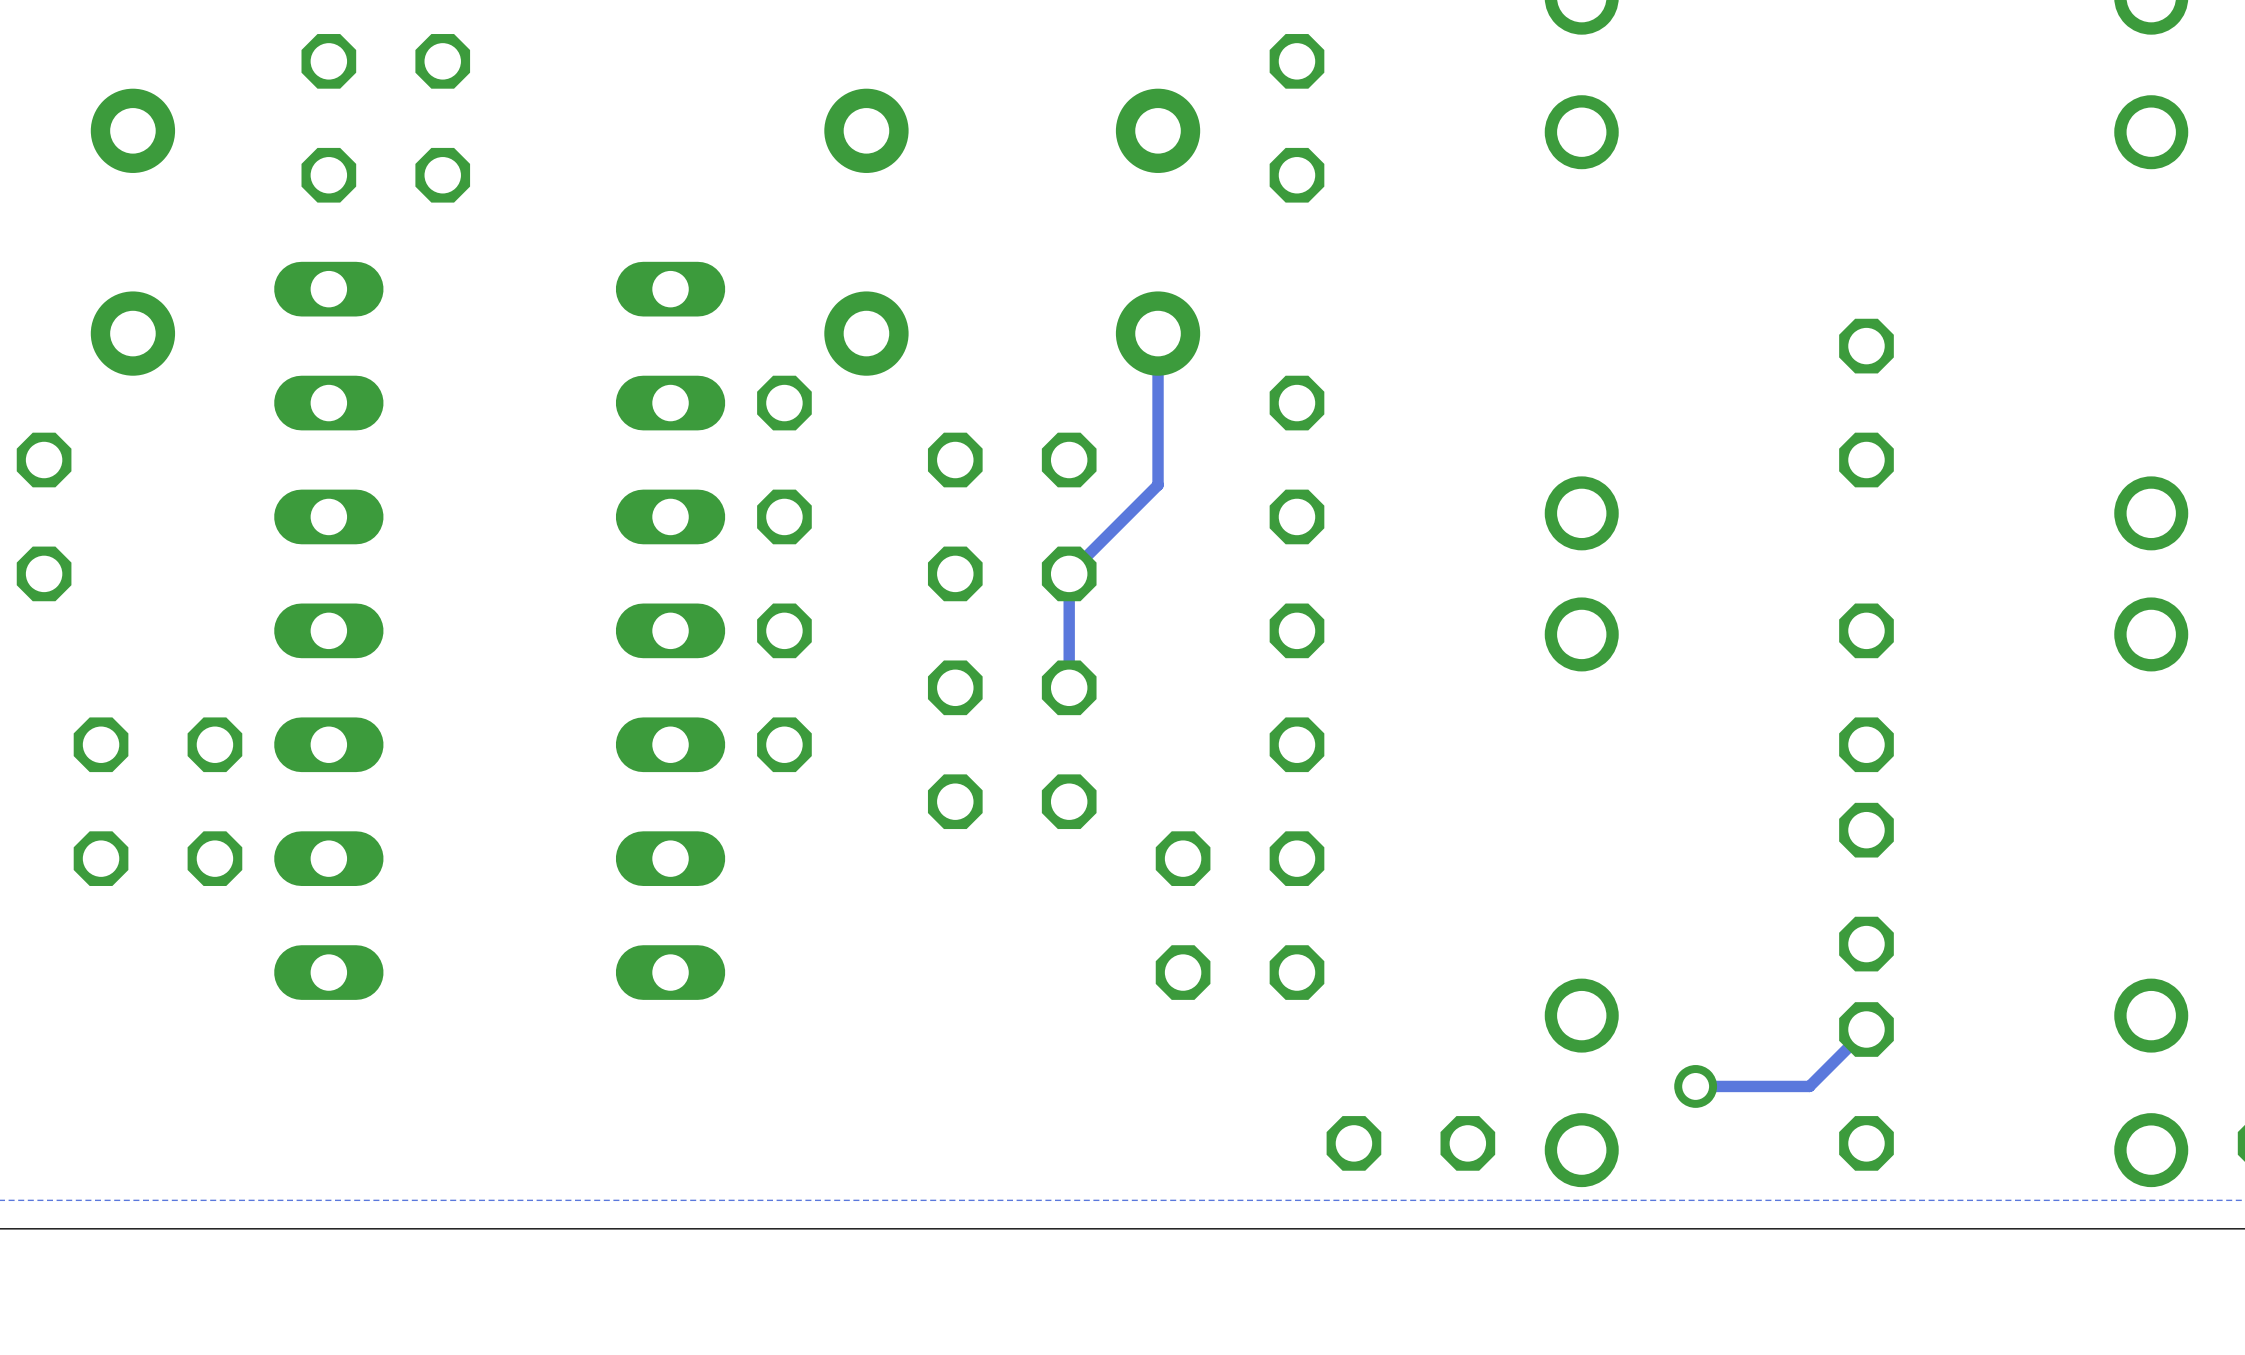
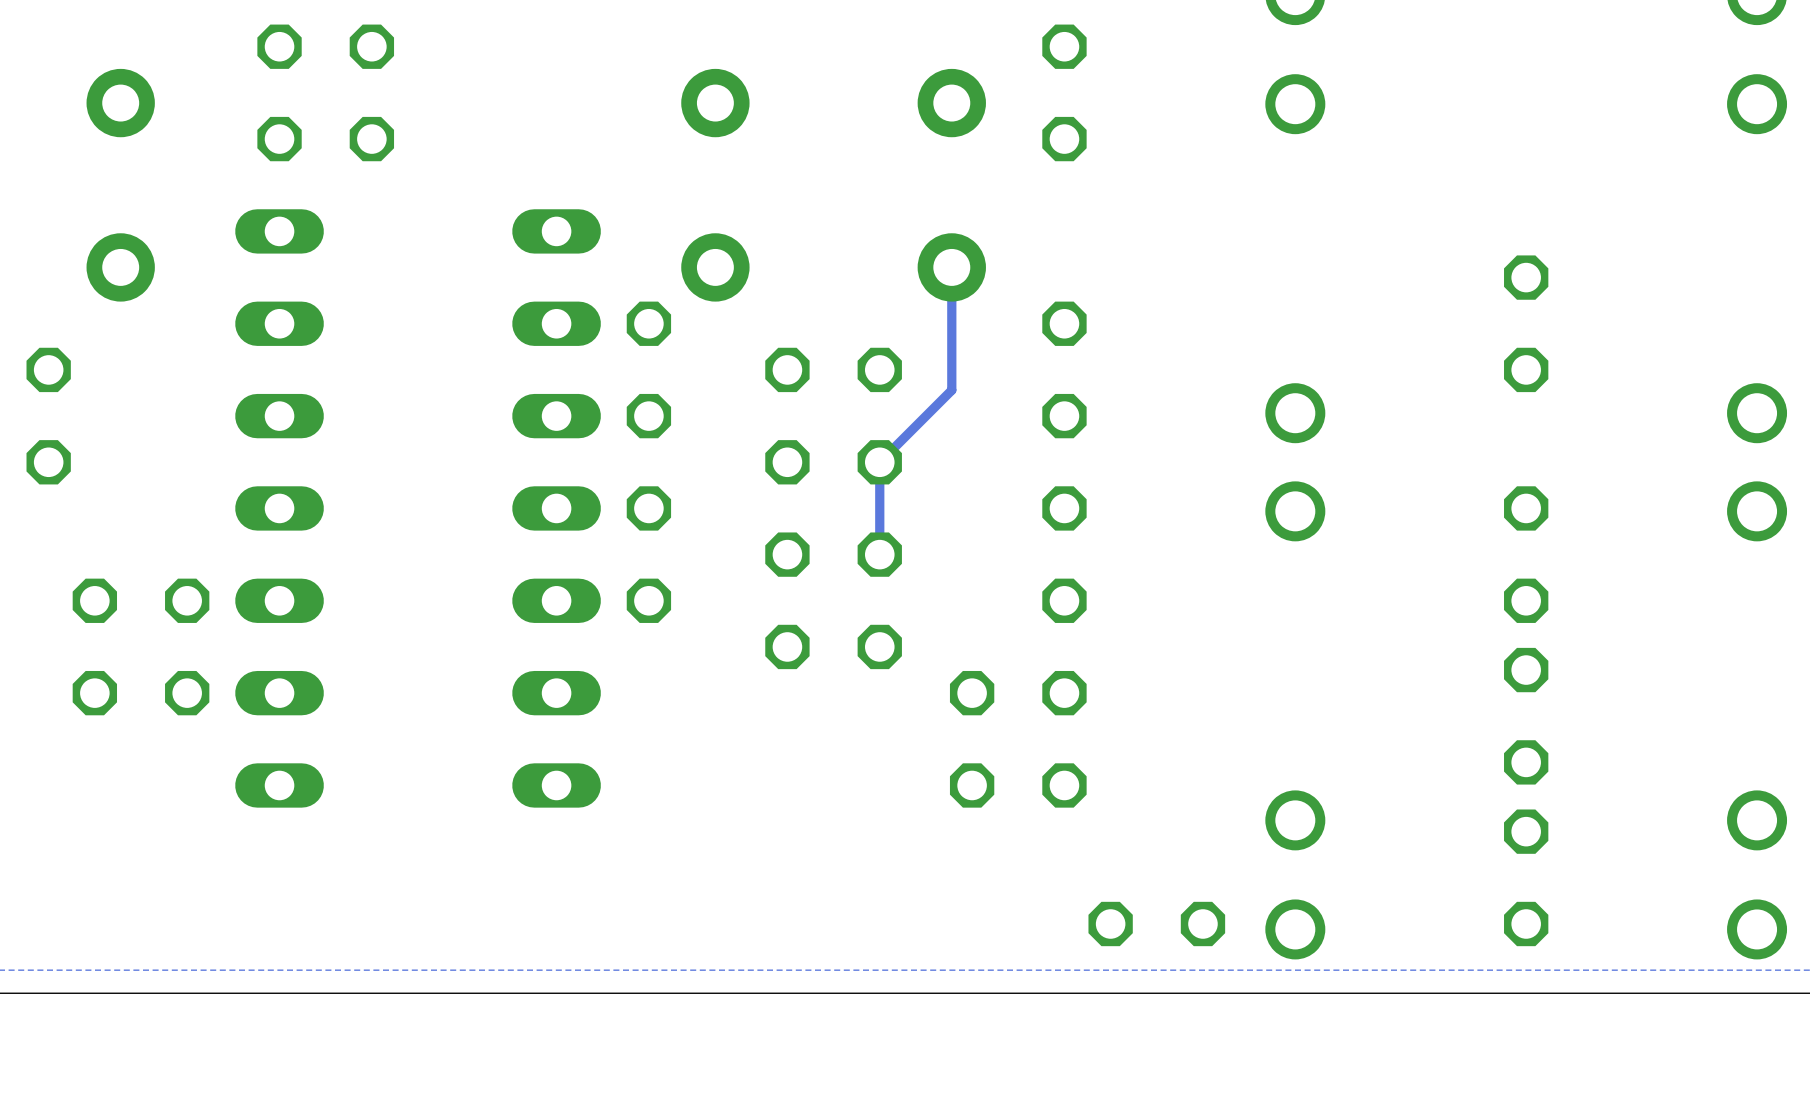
track: (1866, 1029) (1809, 1086) (1695, 1086) -> none
via: (1695, 1086) -> none

